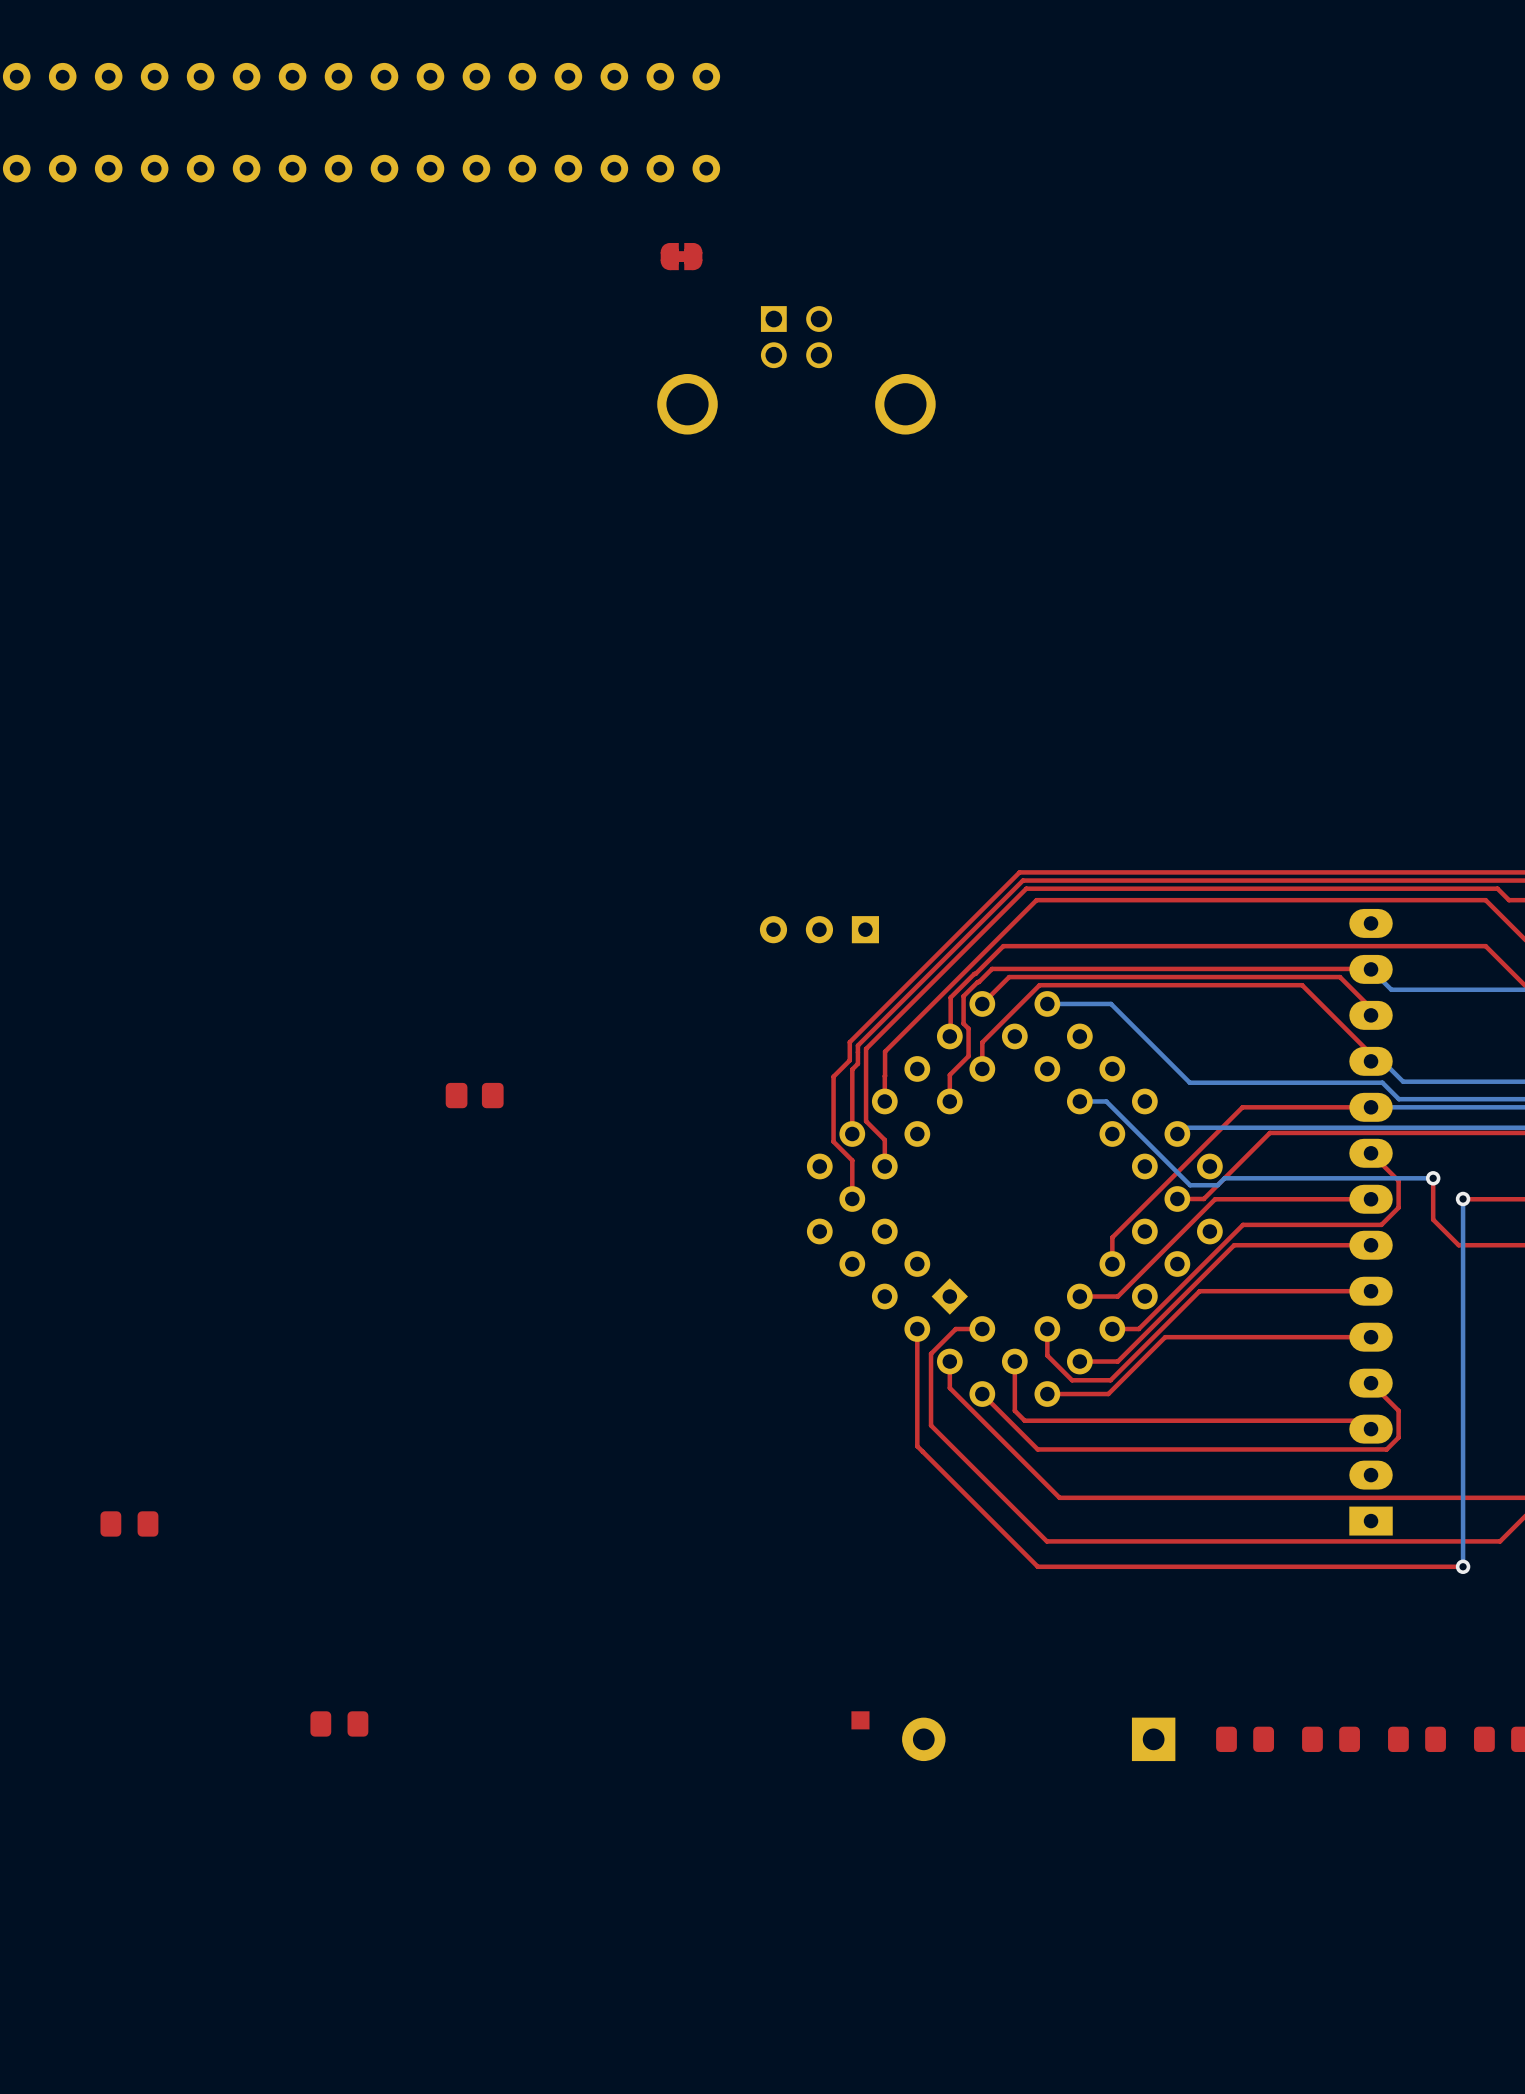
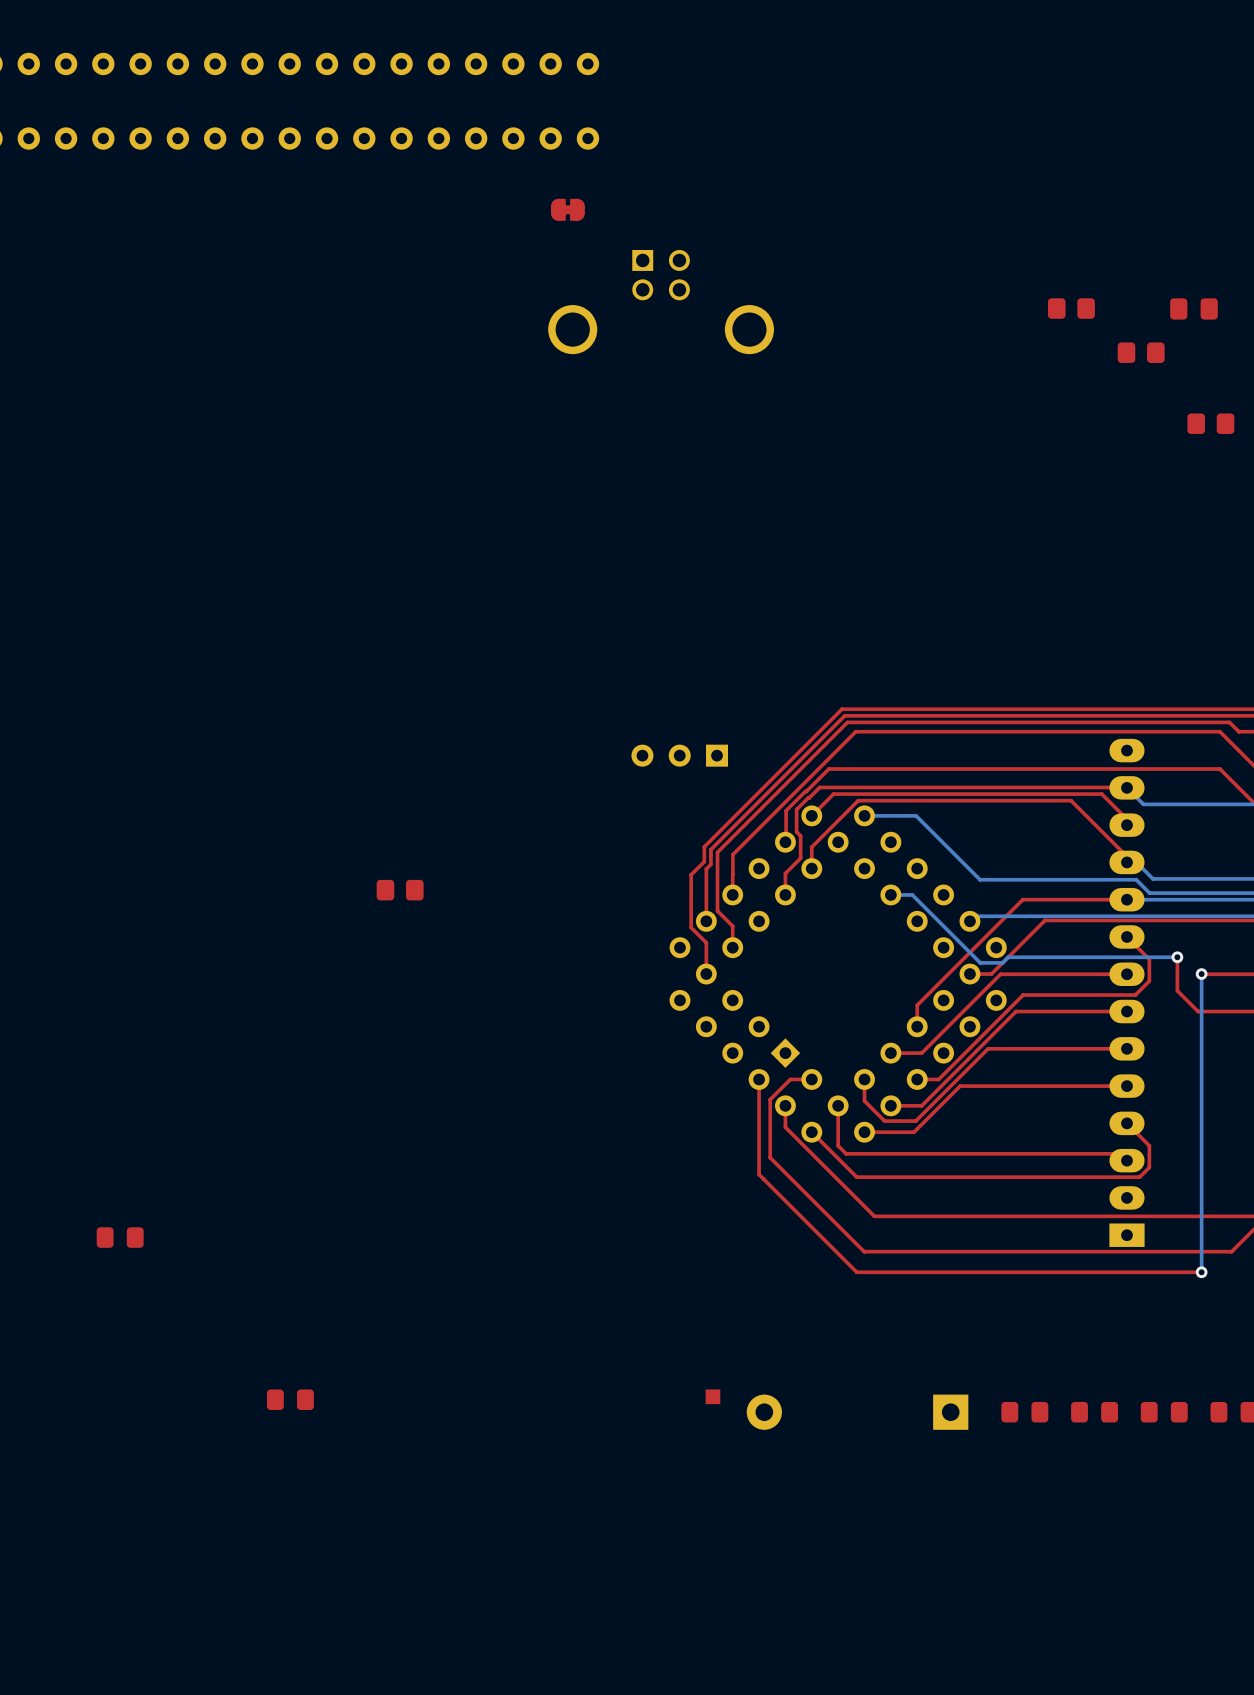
part: none -> (1071, 308)
part: none -> (1193, 308)
part: none -> (1141, 352)
part: none -> (1210, 423)

